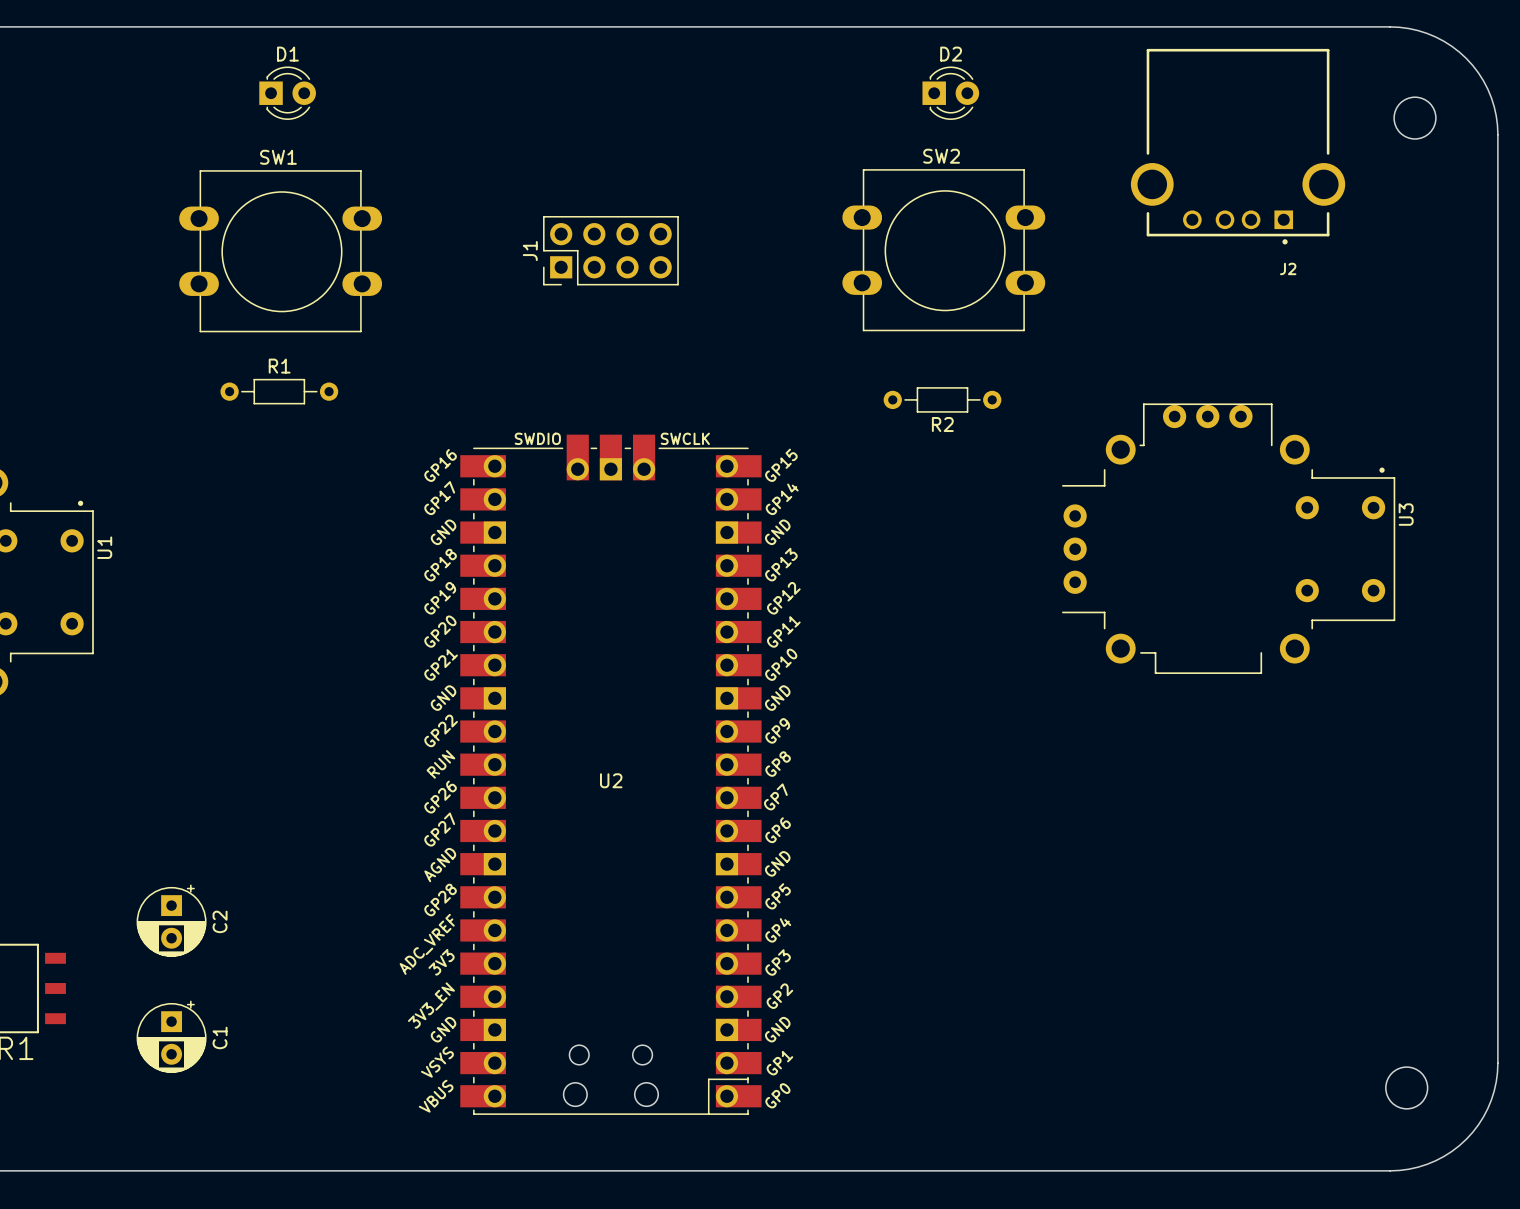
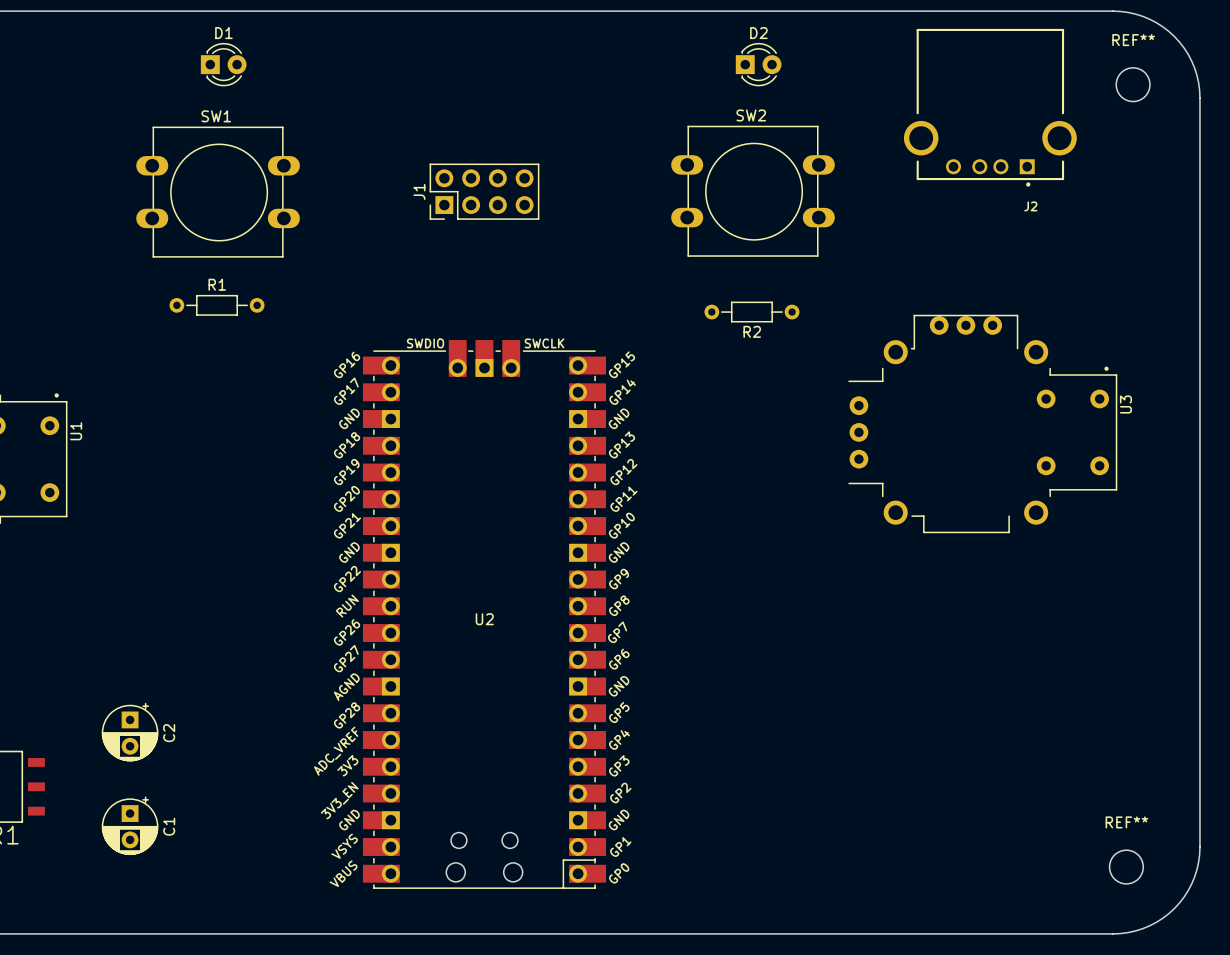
REF** name: none -> REF** (1133, 40)
REF** name: none -> REF** (1126, 822)

